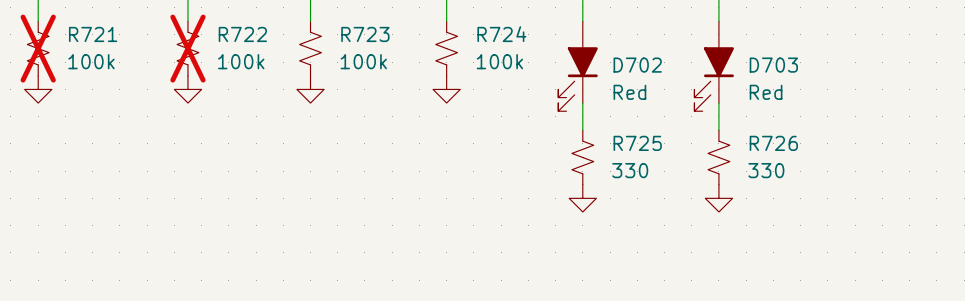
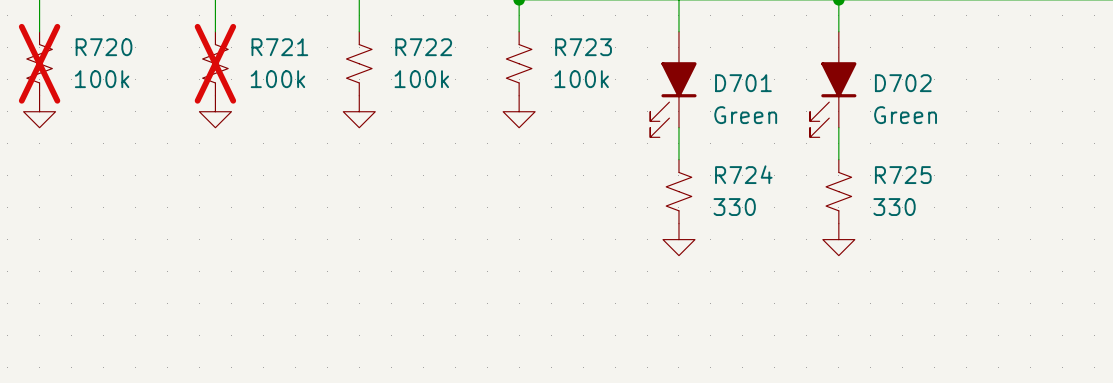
R721 name: R721 (93, 34) -> R720 (104, 47)
R722 name: R722 (242, 34) -> R721 (279, 47)
R723 name: R723 (365, 34) -> R722 (423, 47)
R724 name: R724 (501, 34) -> R723 (583, 47)
D702 name: D702 (637, 65) -> D701 (743, 83)
D703 name: D703 (773, 65) -> D702 (903, 83)
D702 value: Red (629, 92) -> Green (745, 115)
D703 value: Red (766, 92) -> Green (905, 115)
R725 name: R725 (637, 143) -> R724 (743, 174)
R726 name: R726 (773, 143) -> R725 (903, 175)

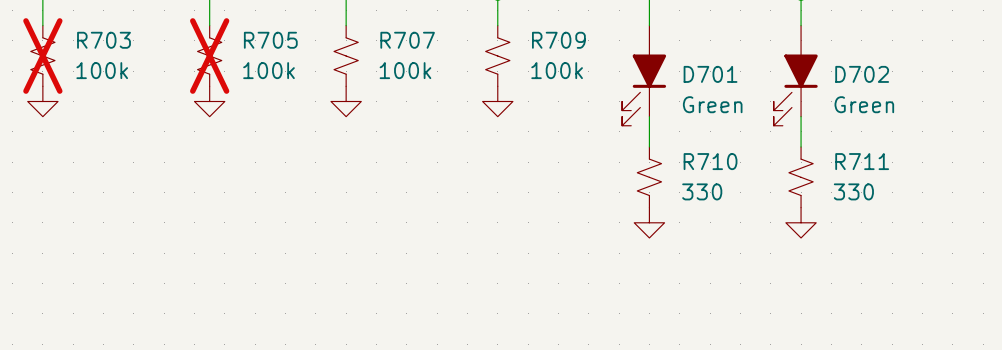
R720 name: R720 (104, 47) -> R703 (104, 40)
R721 name: R721 (279, 47) -> R705 (270, 40)
R722 name: R722 (423, 47) -> R707 (407, 40)
R723 name: R723 (583, 47) -> R709 (558, 40)
R724 name: R724 (743, 174) -> R710 (710, 161)
R725 name: R725 (903, 175) -> R711 (862, 161)

